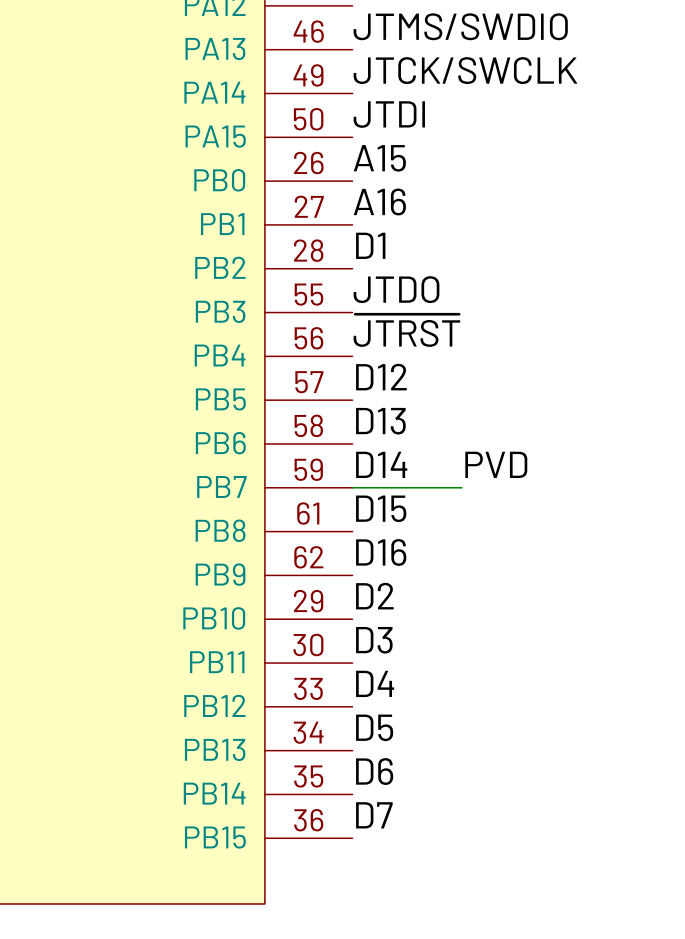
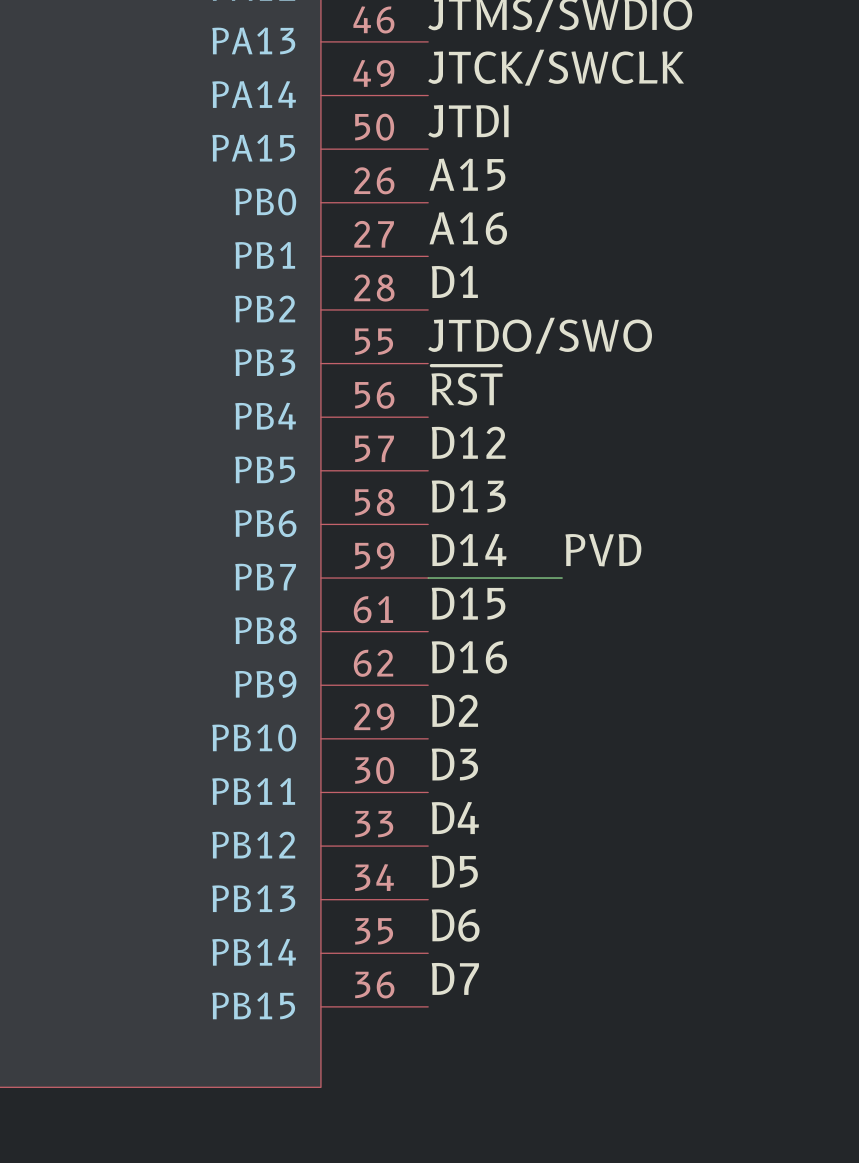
label: JTDO (396, 289) -> JTDO/SWO (540, 335)
label: ~{JTRST} (406, 330) -> ~{RST} (466, 385)

